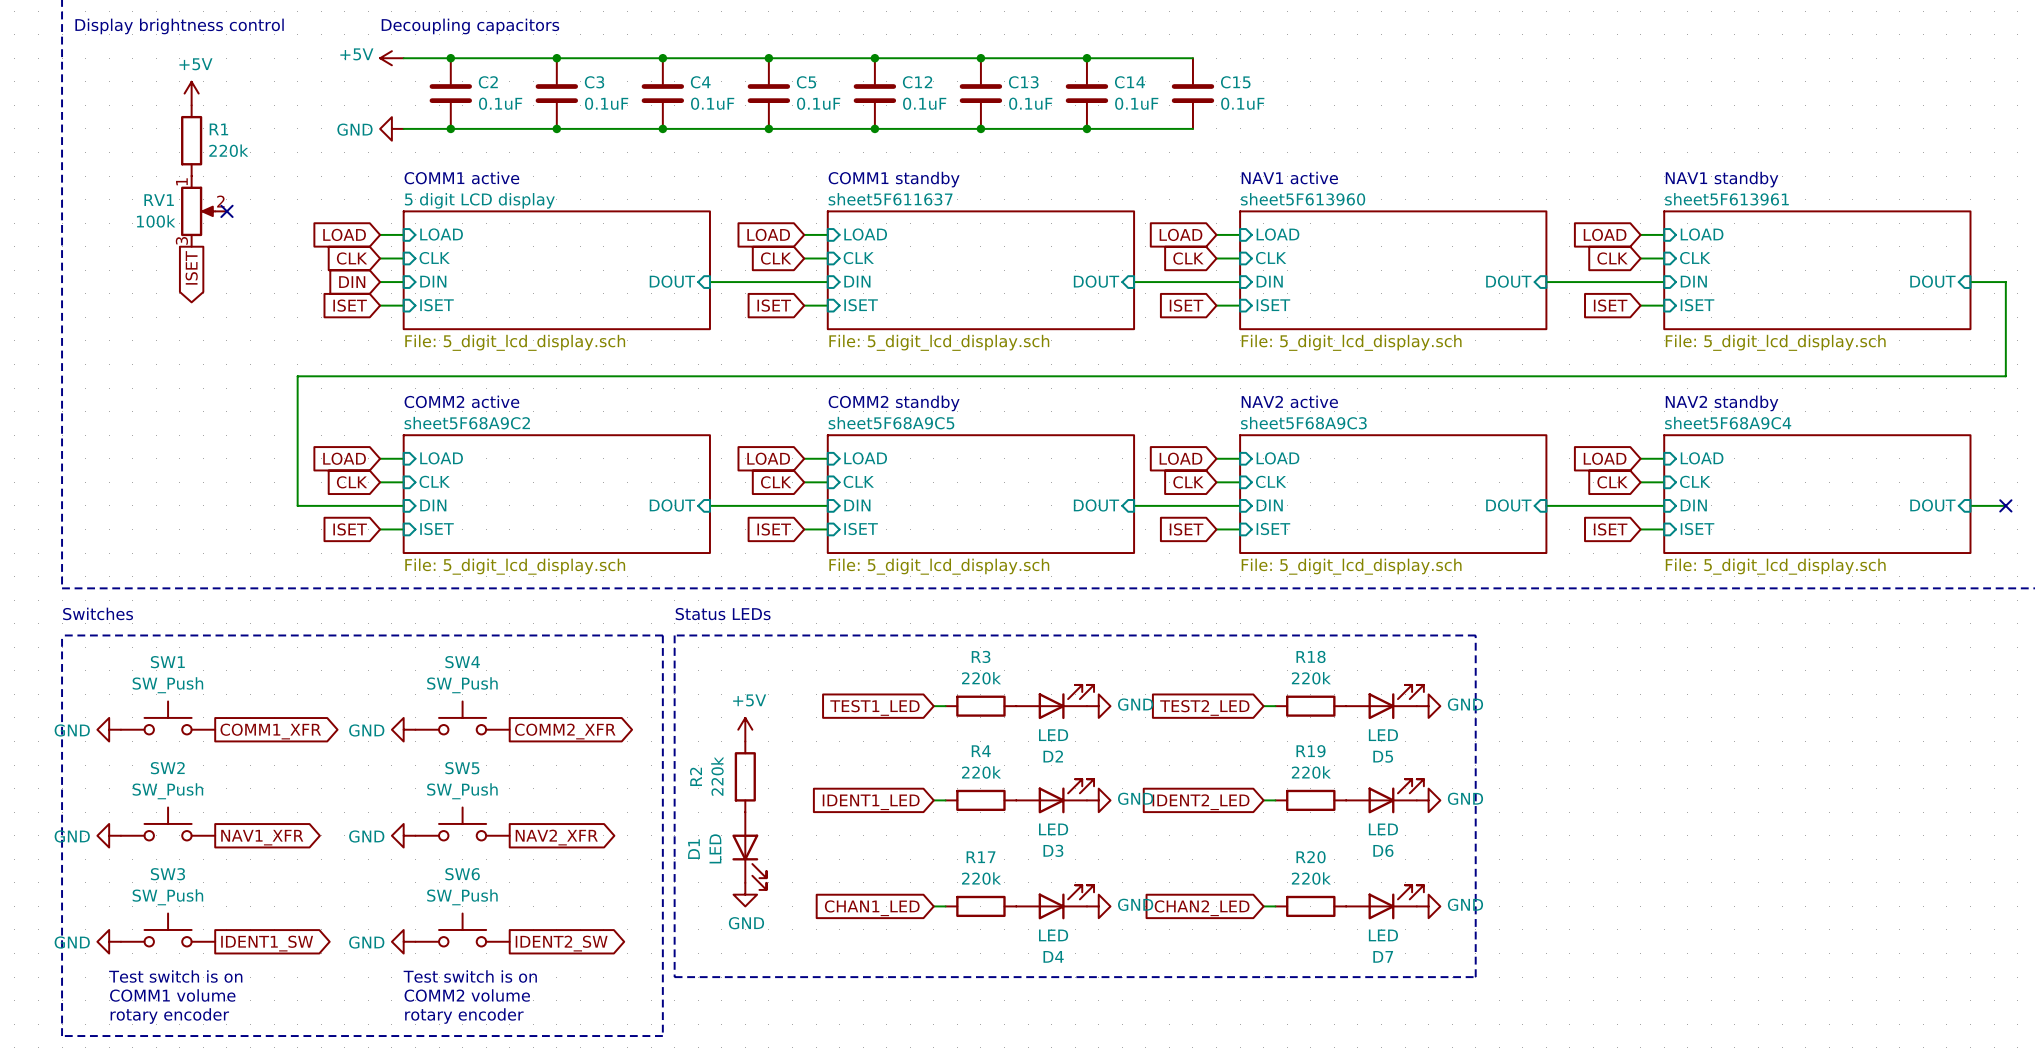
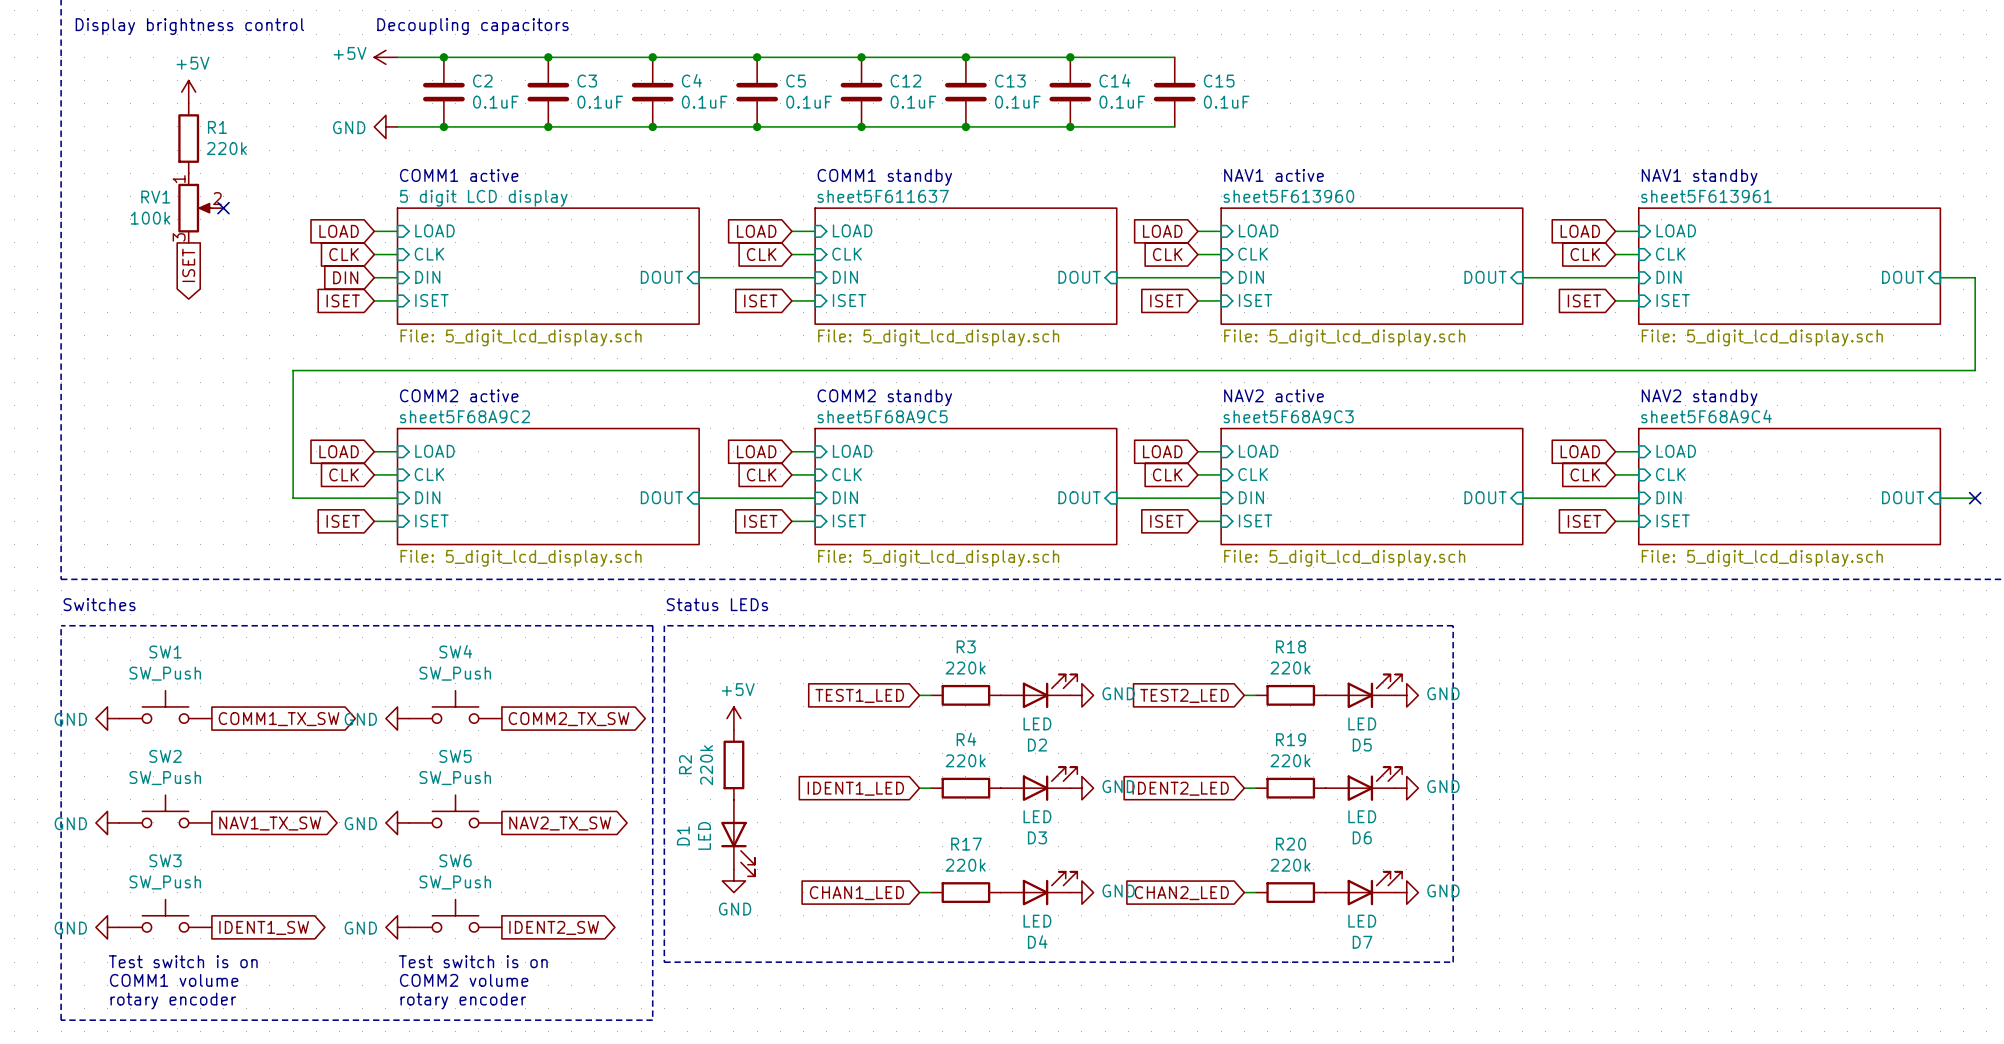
global label: COMM1_XFR (270, 731) -> COMM1_TX_SW (279, 719)
global label: COMM2_XFR (565, 731) -> COMM2_TX_SW (569, 719)
global label: NAV1_XFR (262, 837) -> NAV1_TX_SW (270, 823)
global label: NAV2_XFR (556, 837) -> NAV2_TX_SW (560, 823)

